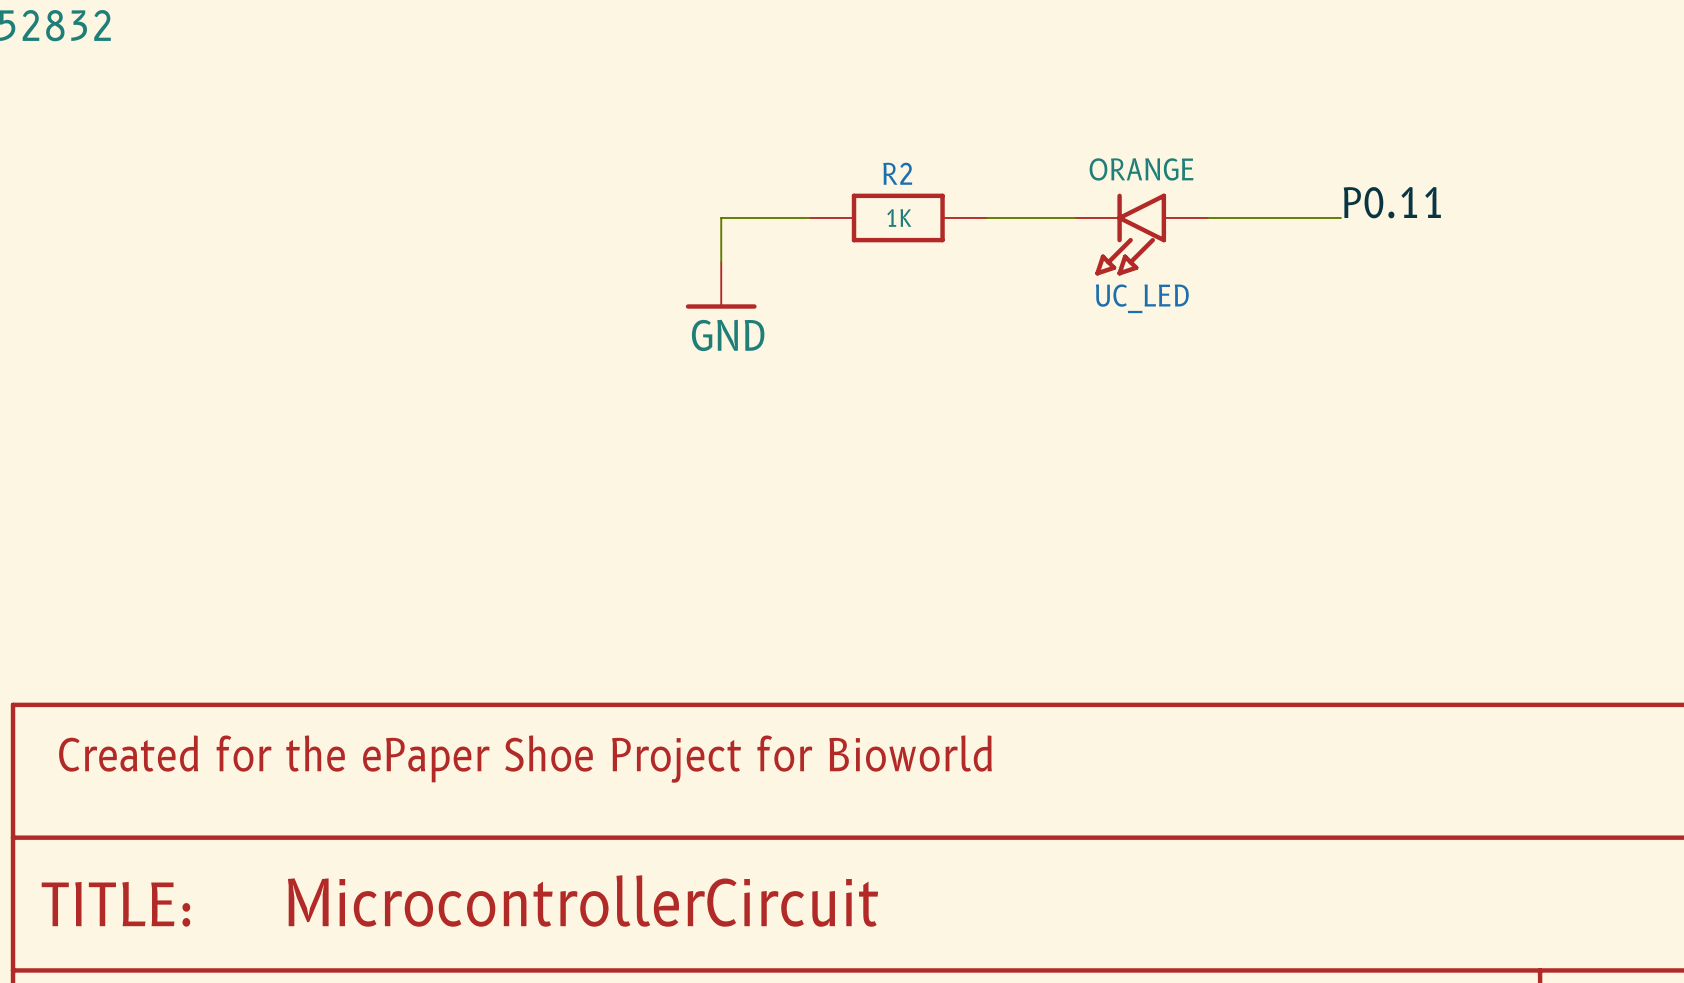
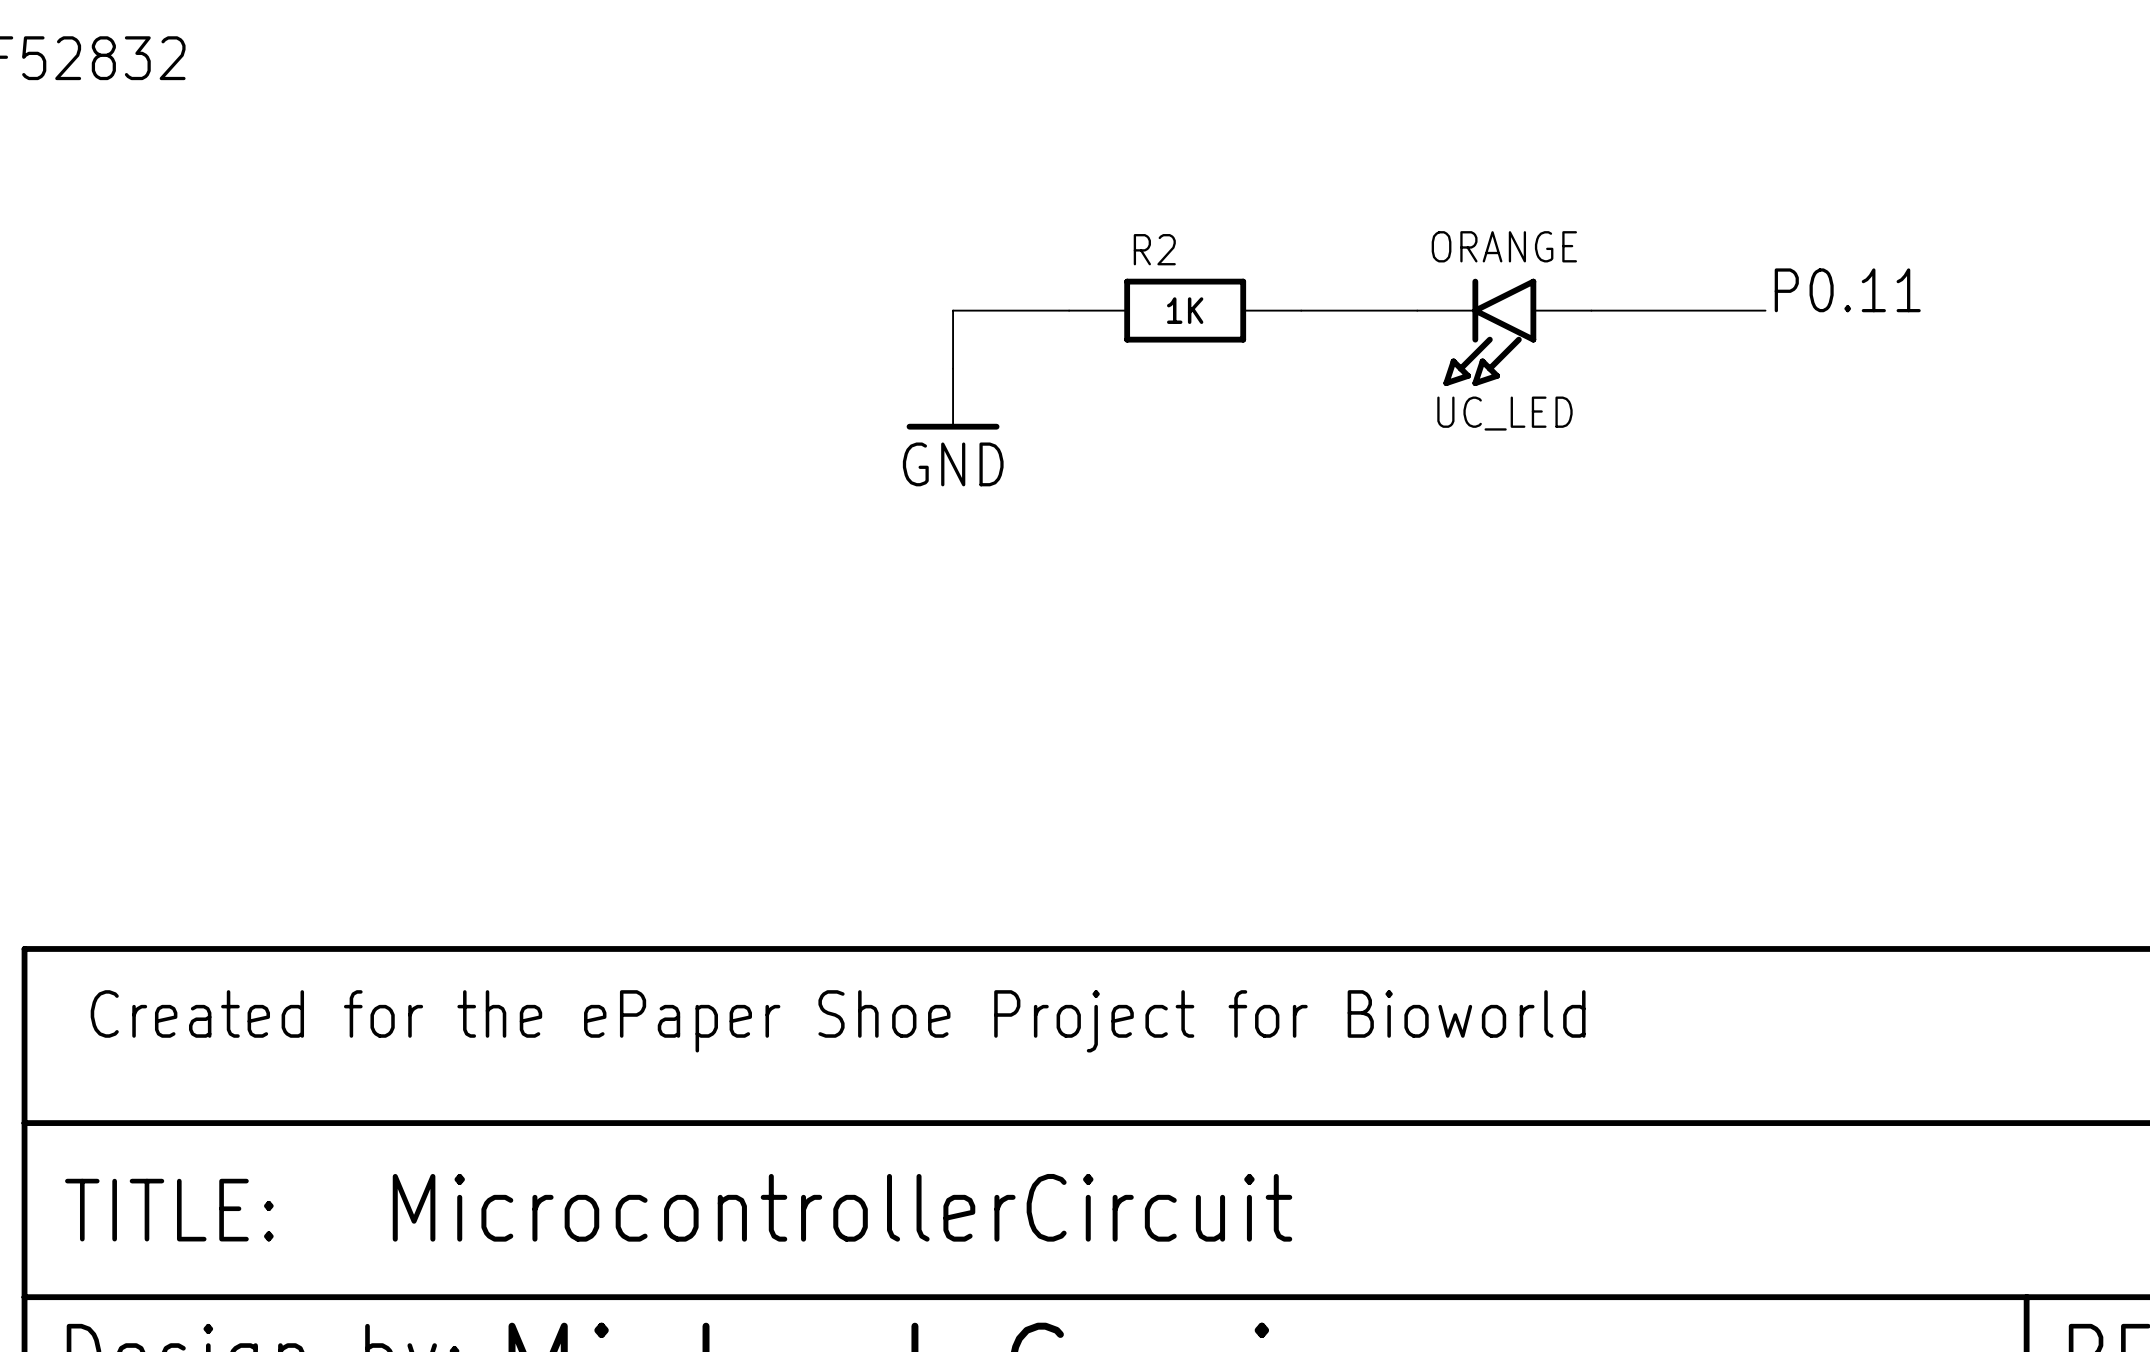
R2 name position: R2 (897, 173) -> R2 (1154, 249)

